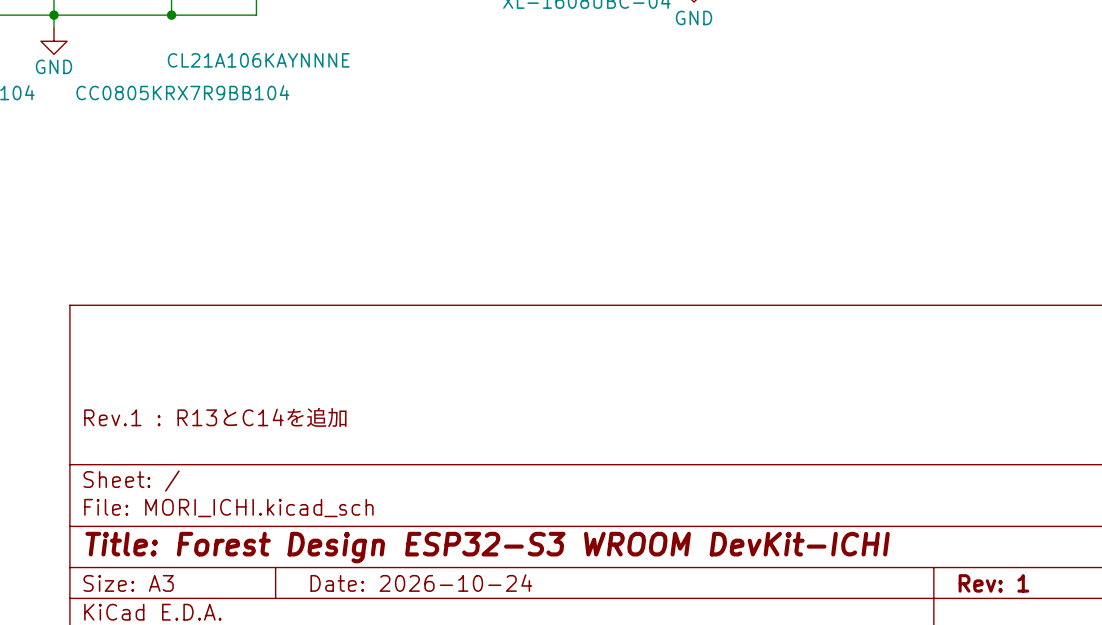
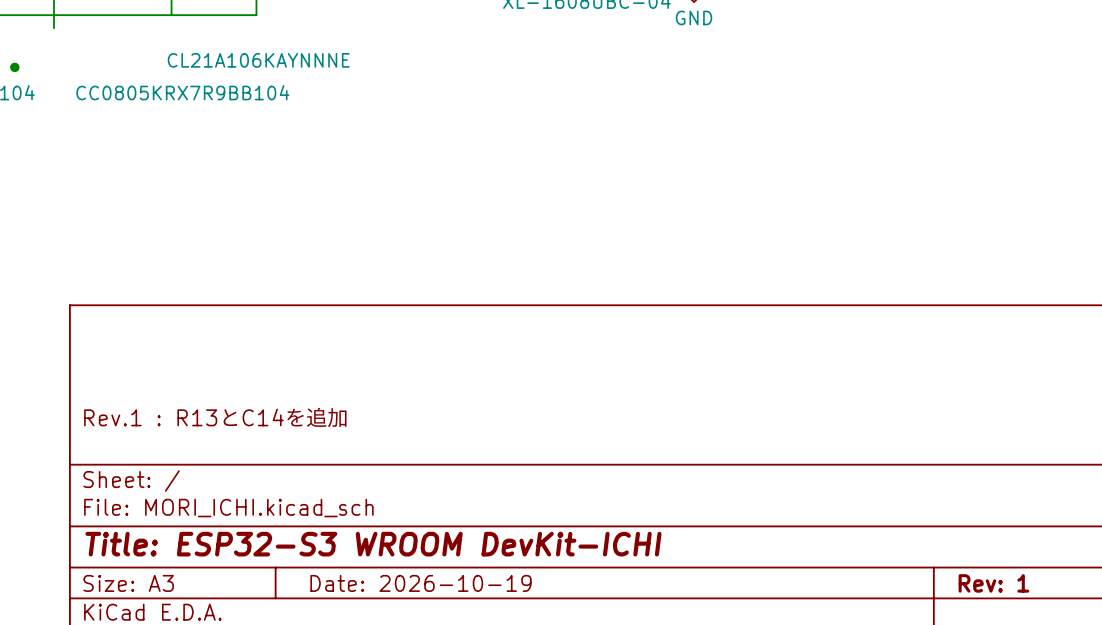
junction: (53, 15) -> none
junction: (171, 15) -> none
power symbol: GND (53, 41) -> none
junction: none -> (14, 67)
title block: Title: Forest Design ESP32-S3 WROOM DevKit-ICHI (487, 547) -> Title: ESP32-S3 WROOM DevKit-ICHI (373, 544)
title block: Date: 2026-10-24 (421, 583) -> Date: 2026-10-19 (421, 583)

